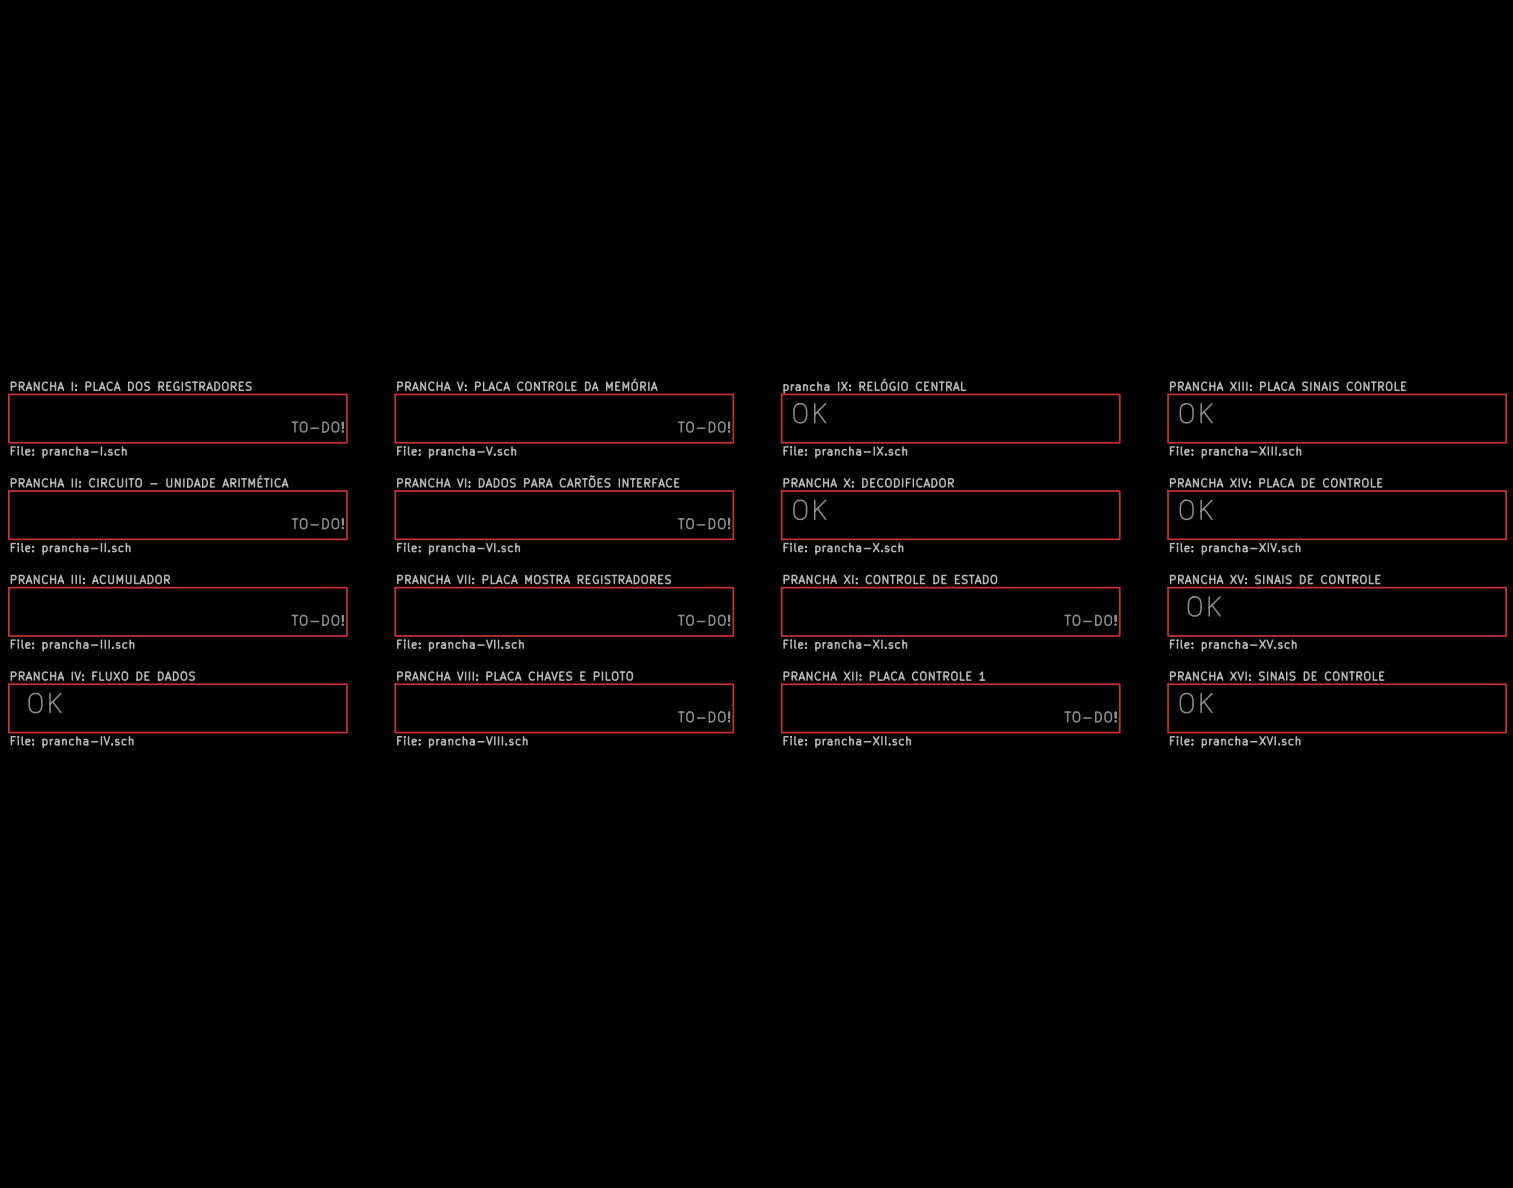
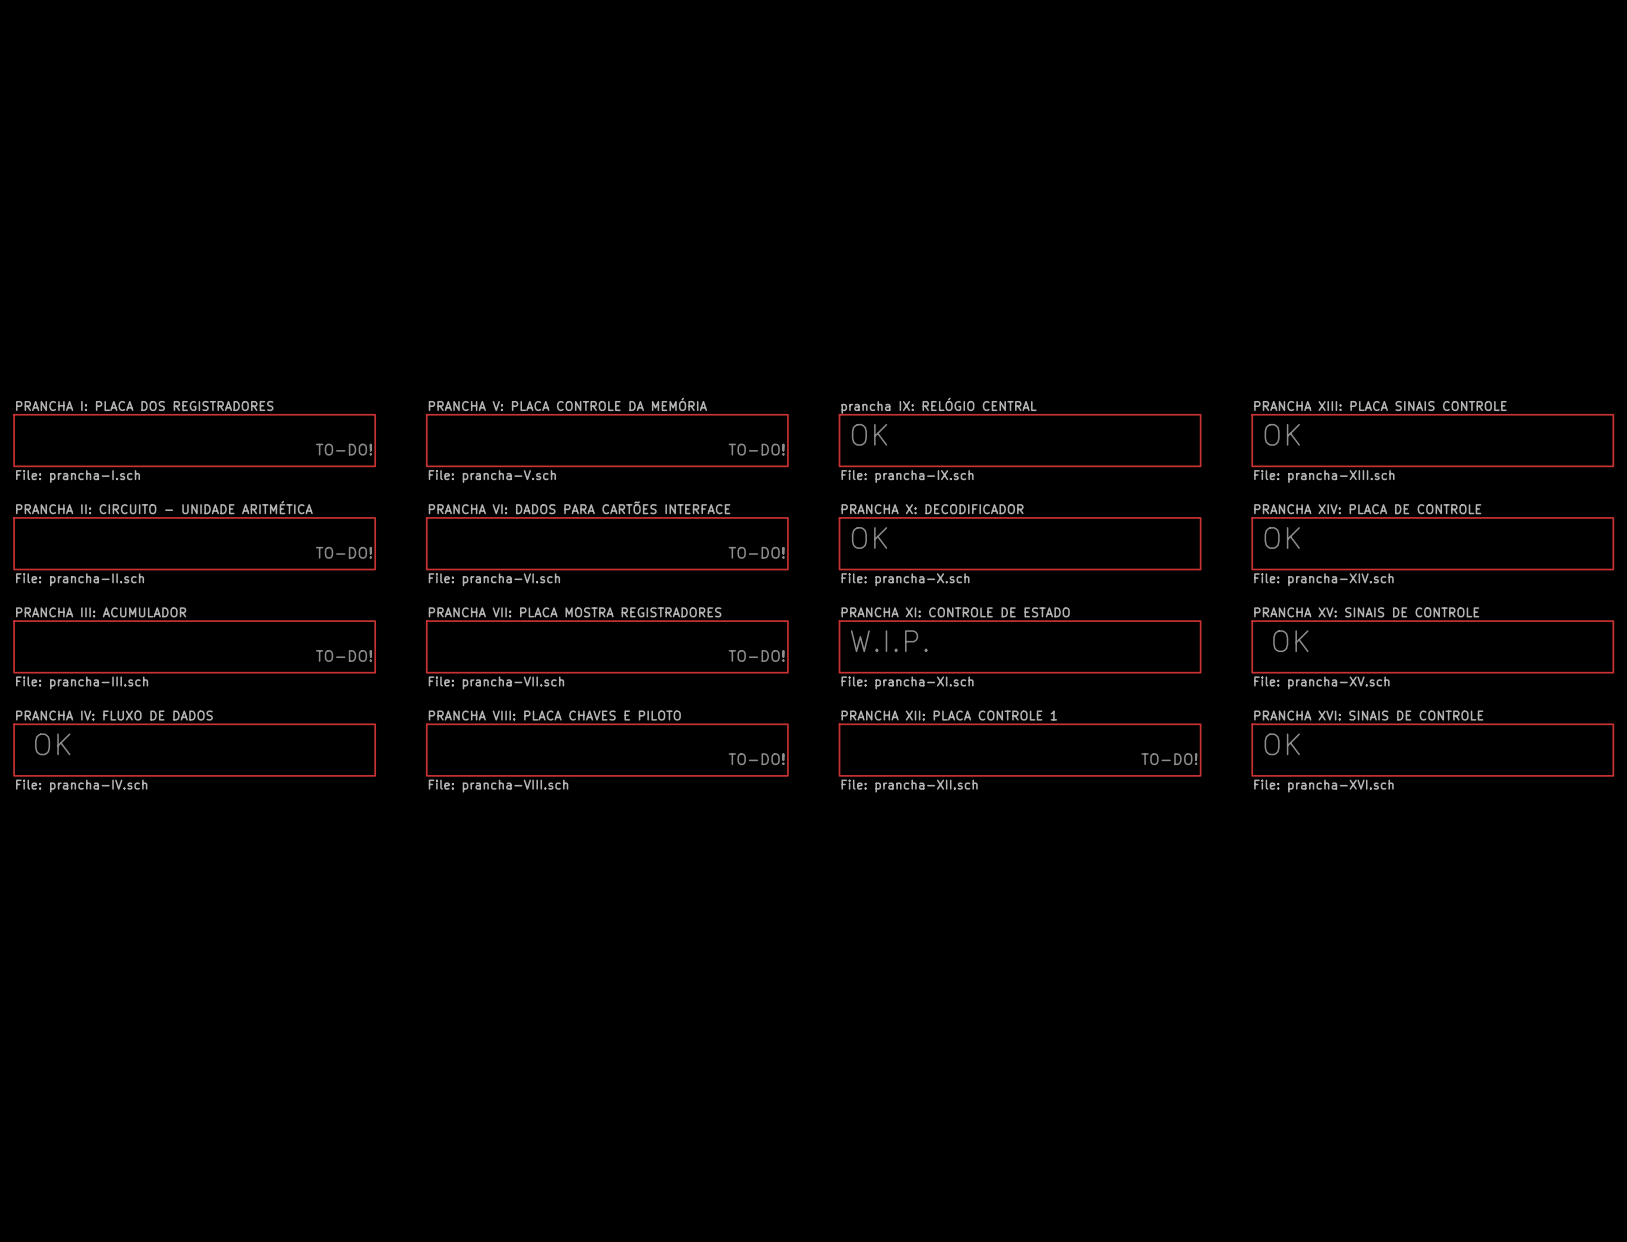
text: none -> W.I.P. (889, 641)
text: TO-DO! (1090, 620) -> none

